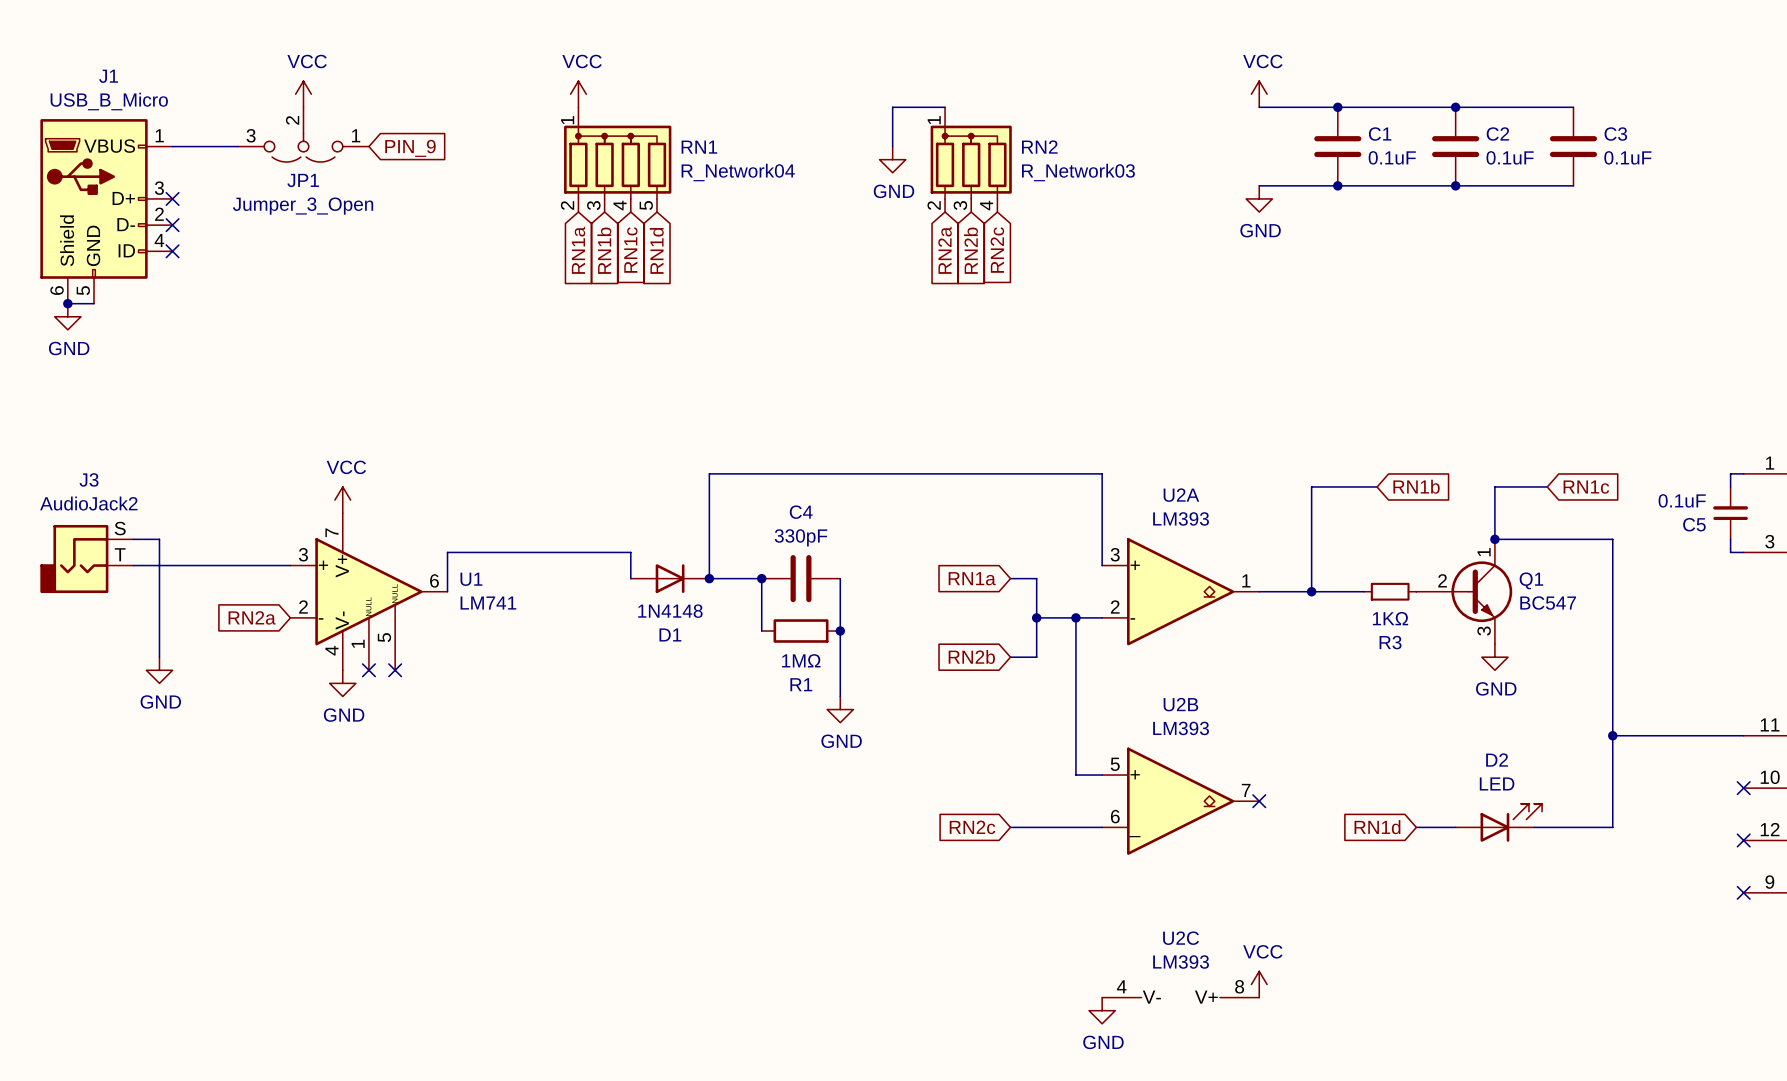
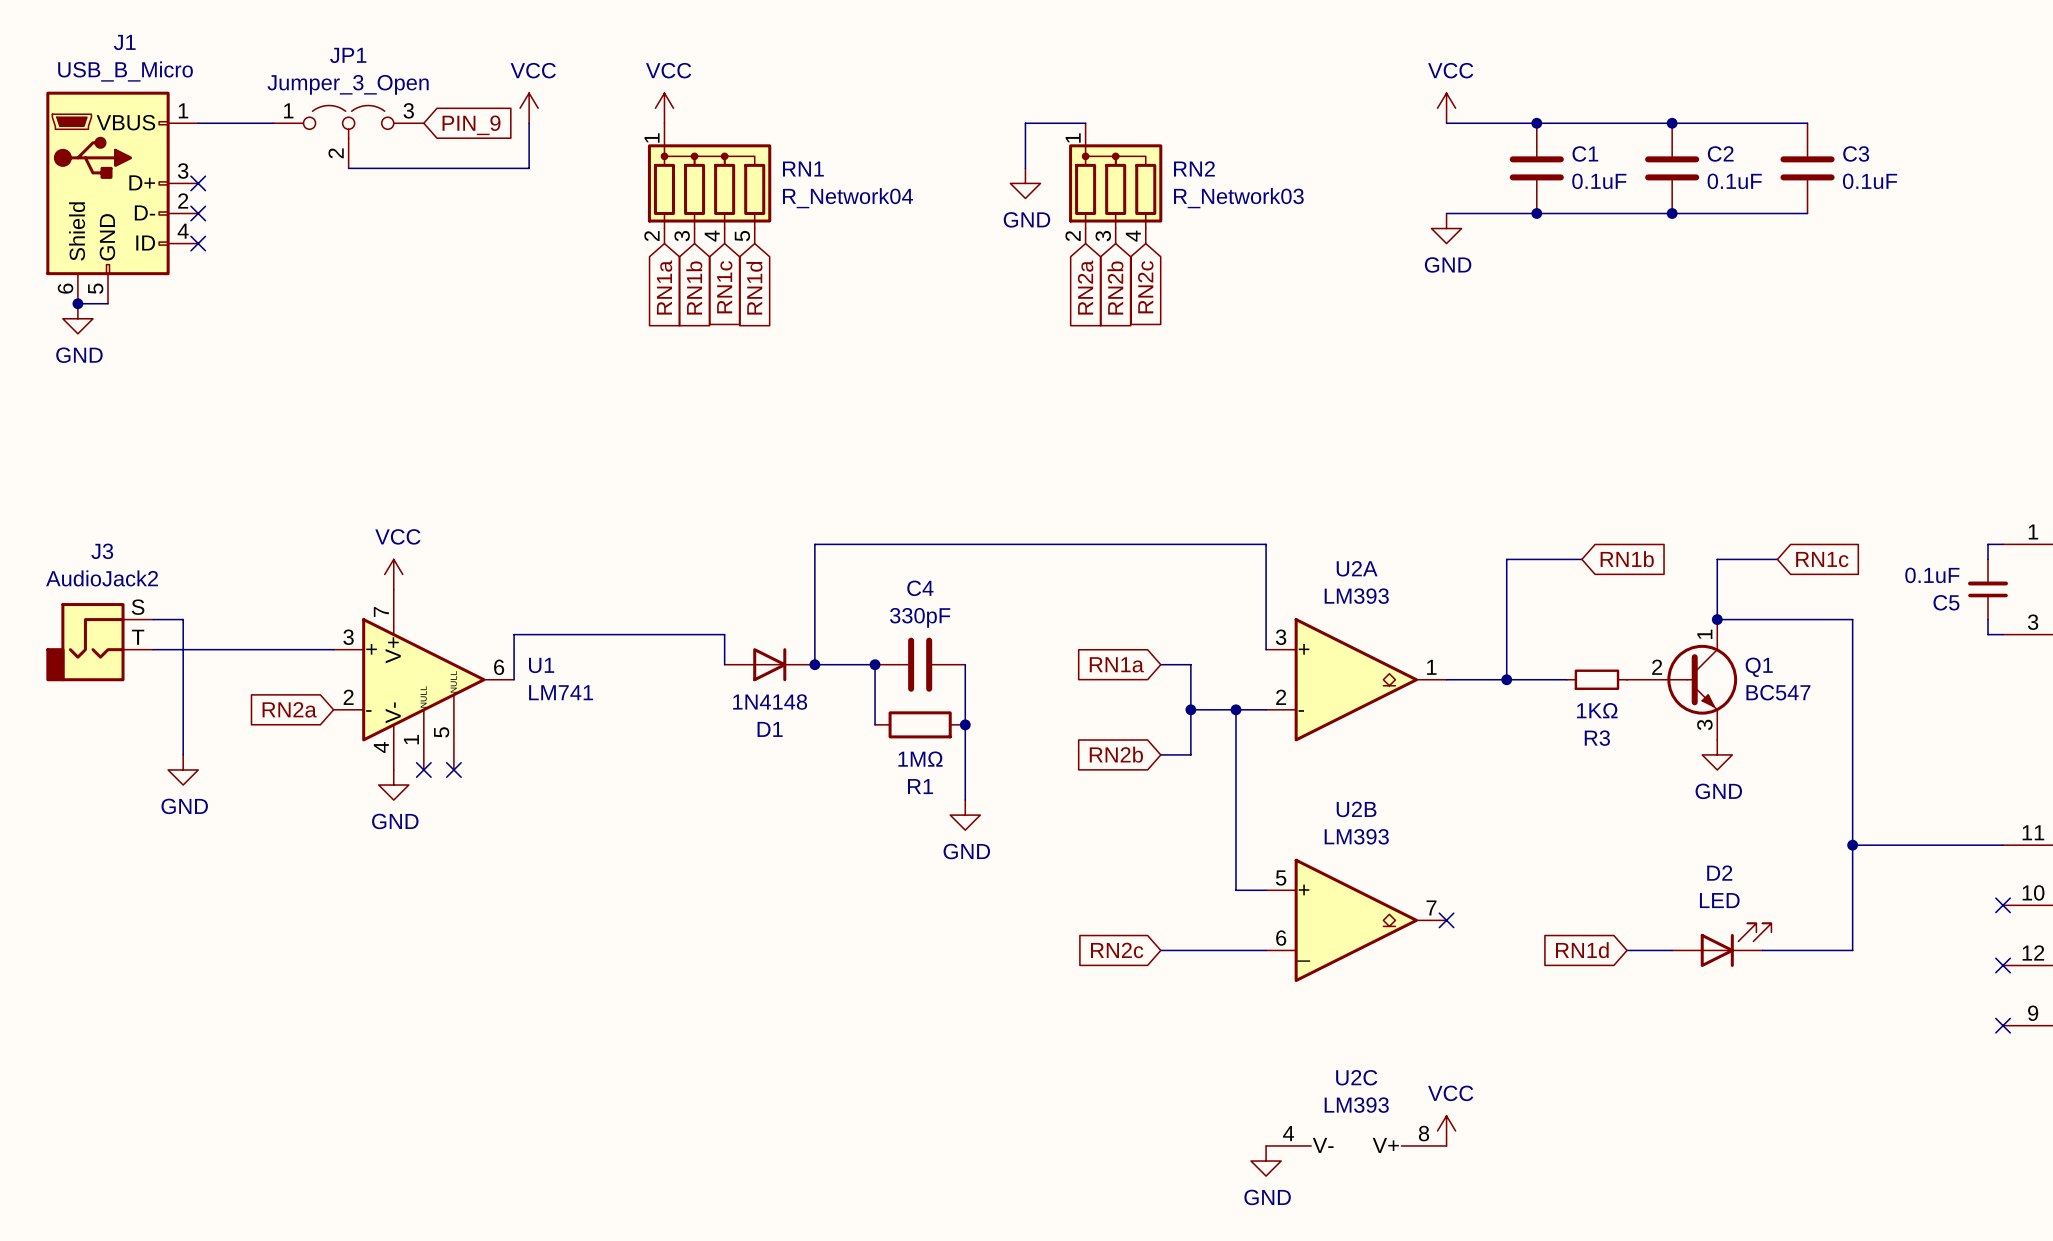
power symbol position: VCC (303, 94) -> VCC (529, 108)
wire: none -> (529, 123) (529, 168) (348, 168)
wire: (172, 146) (238, 146) -> (198, 123) (273, 123)
JP1 rotation: 0° (303, 147) -> 180° (348, 121)
global label position: PIN_9 (410, 148) -> PIN_9 (471, 125)
no-connect mark: none -> (198, 183)
JP1 name position: JP1 (303, 180) -> JP1 (348, 55)
no-connect mark: none -> (198, 213)
no-connect mark: (172, 198) -> none
JP1 value position: Jumper_3_Open (303, 206) -> Jumper_3_Open (348, 84)
J1 position: (106, 211) -> (122, 197)
no-connect mark: none -> (198, 243)
no-connect mark: (172, 225) -> none
no-connect mark: (172, 251) -> none
junction position: (67, 303) -> (77, 303)
power symbol position: GND (67, 316) -> GND (77, 318)

